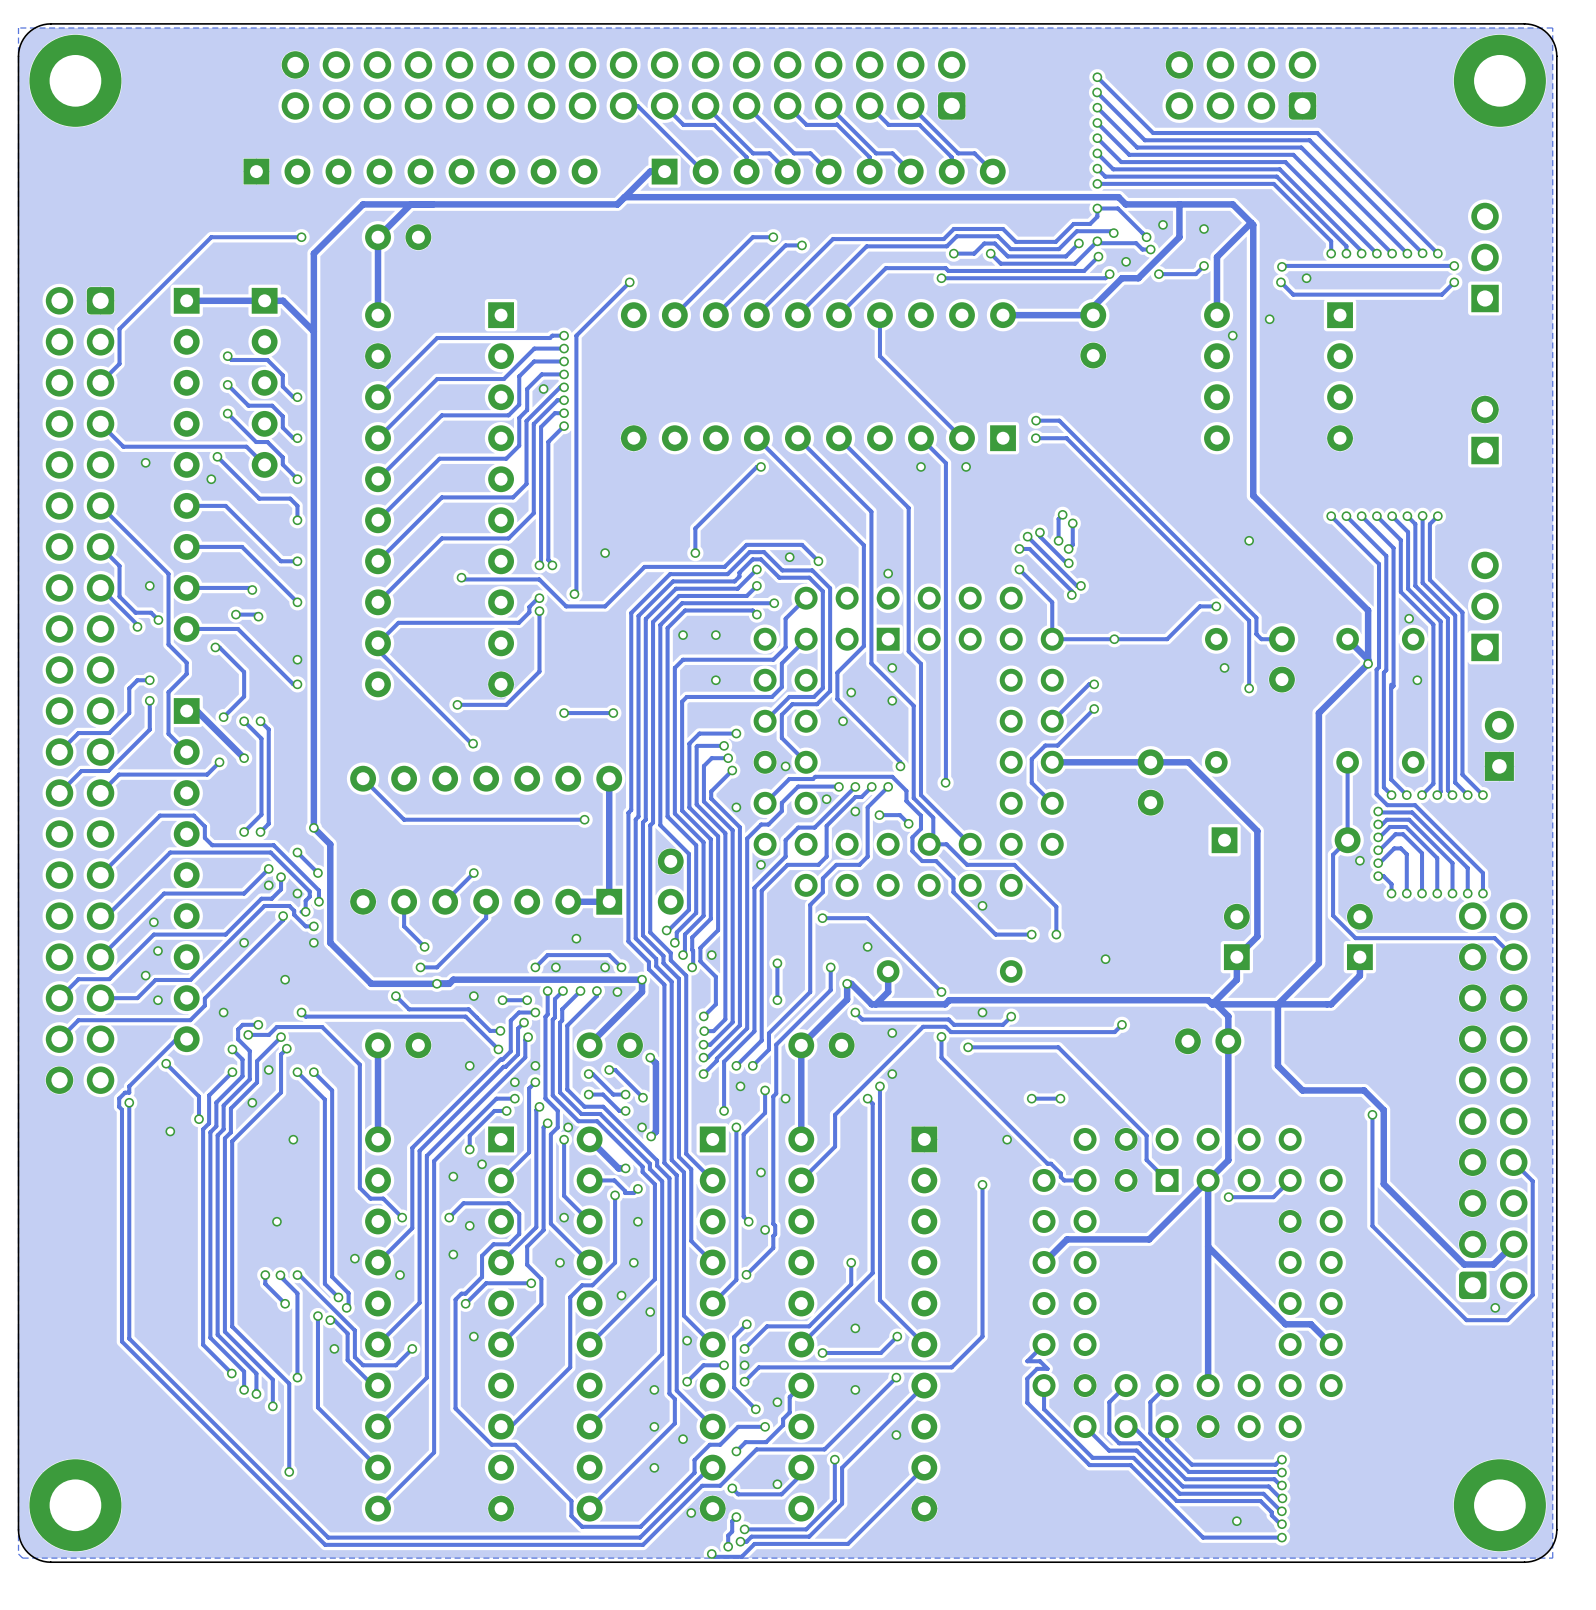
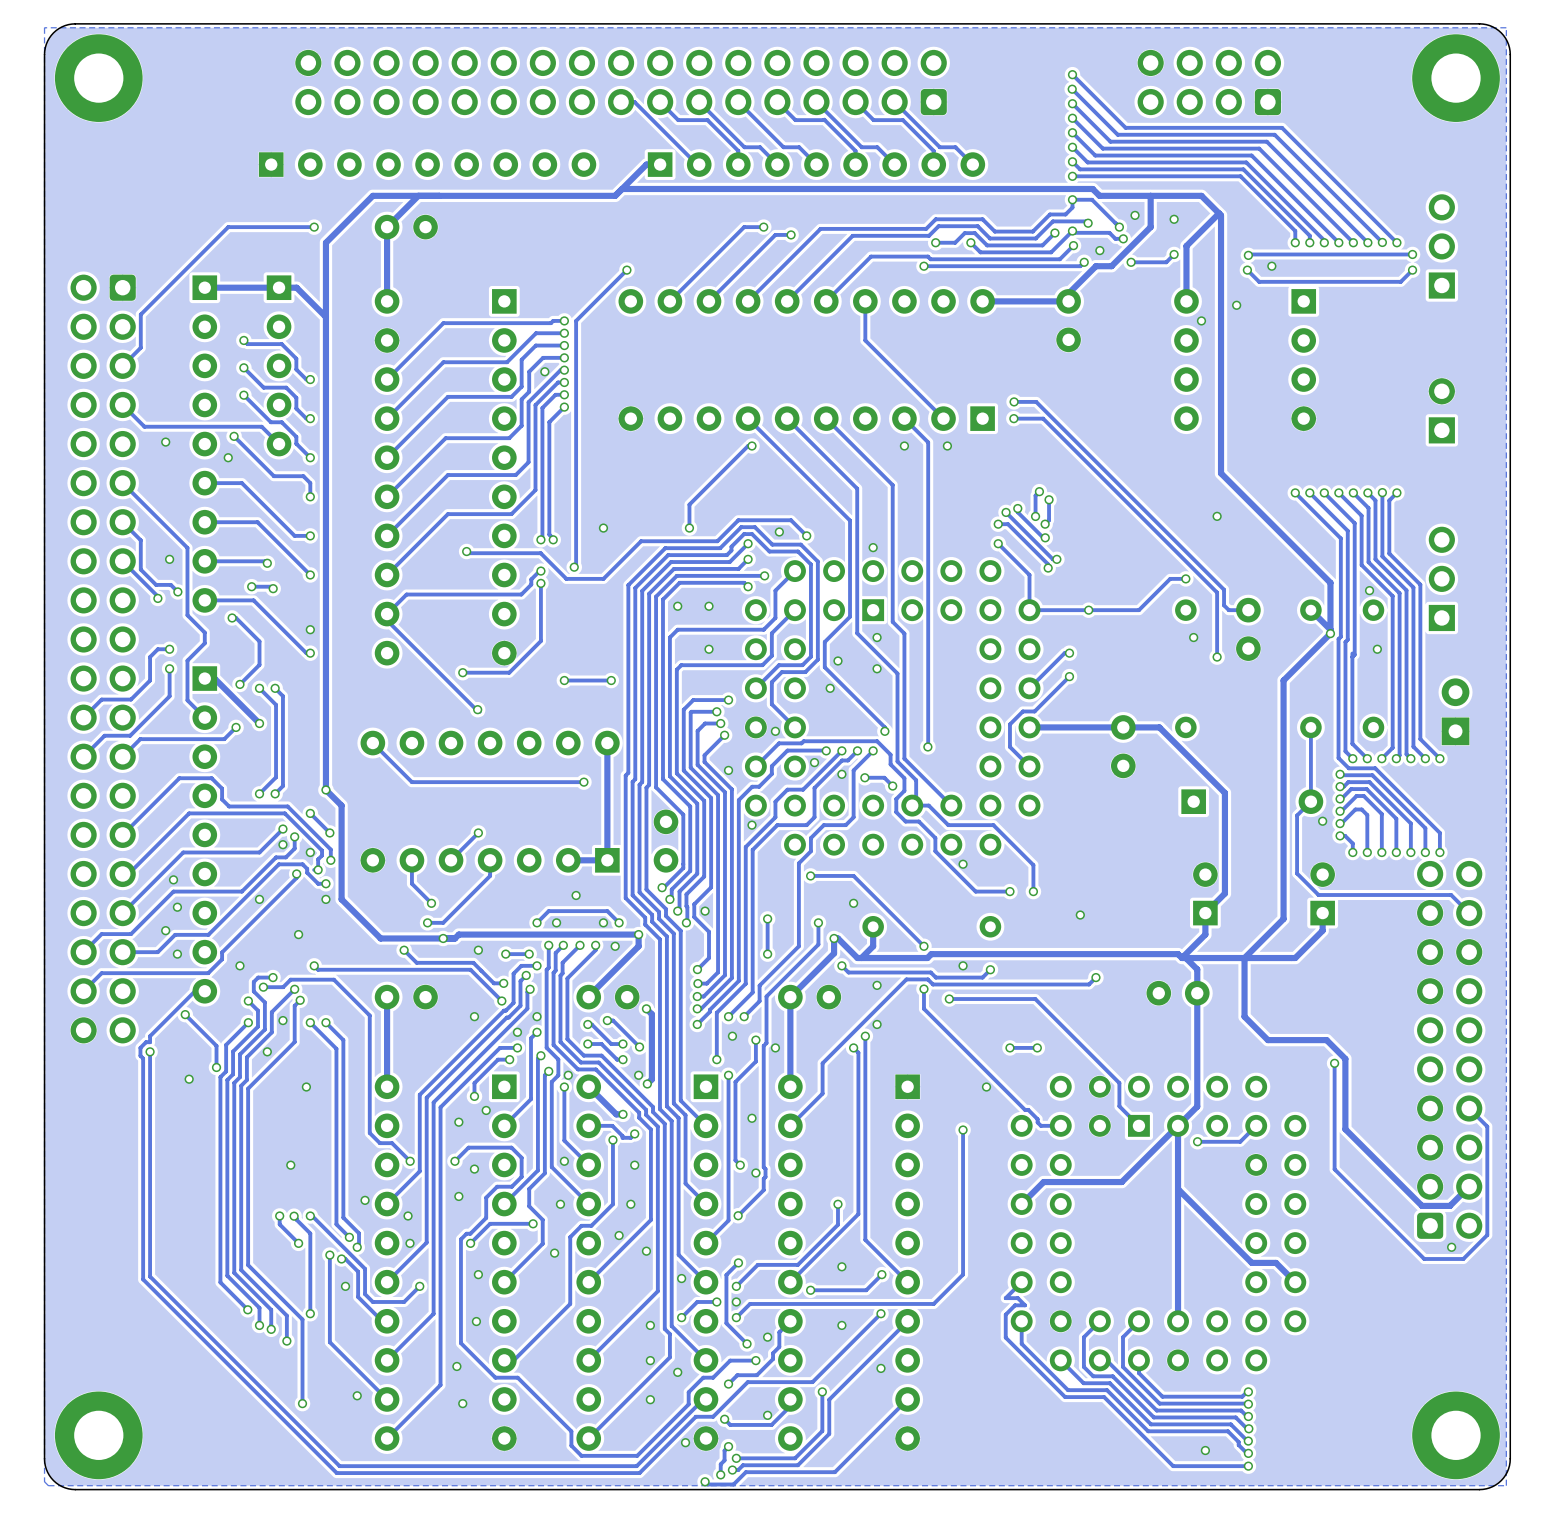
via: none -> (409, 1243)
via: none -> (554, 1253)
via: none -> (476, 1321)
via: none -> (456, 1366)
via: none -> (357, 1395)
via: none -> (462, 1403)

